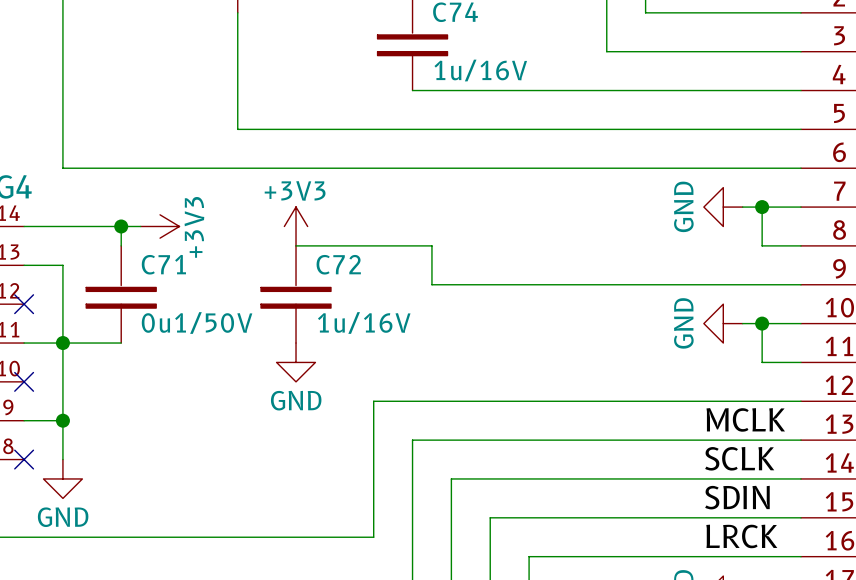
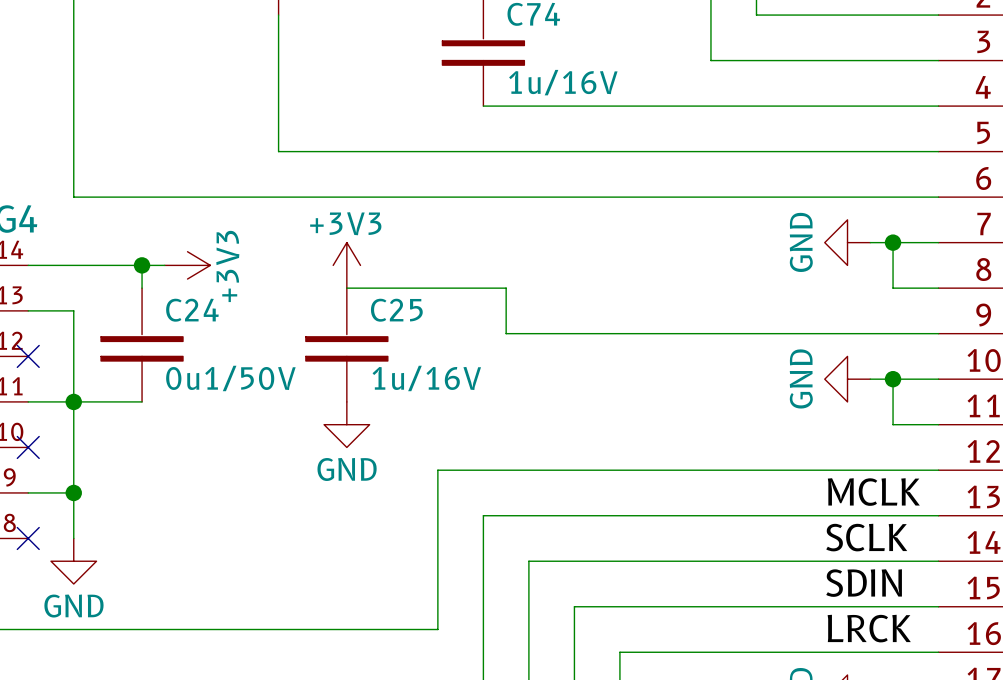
C71 name: C71 (163, 264) -> C24 (192, 310)
C72 name: C72 (338, 264) -> C25 (396, 310)

